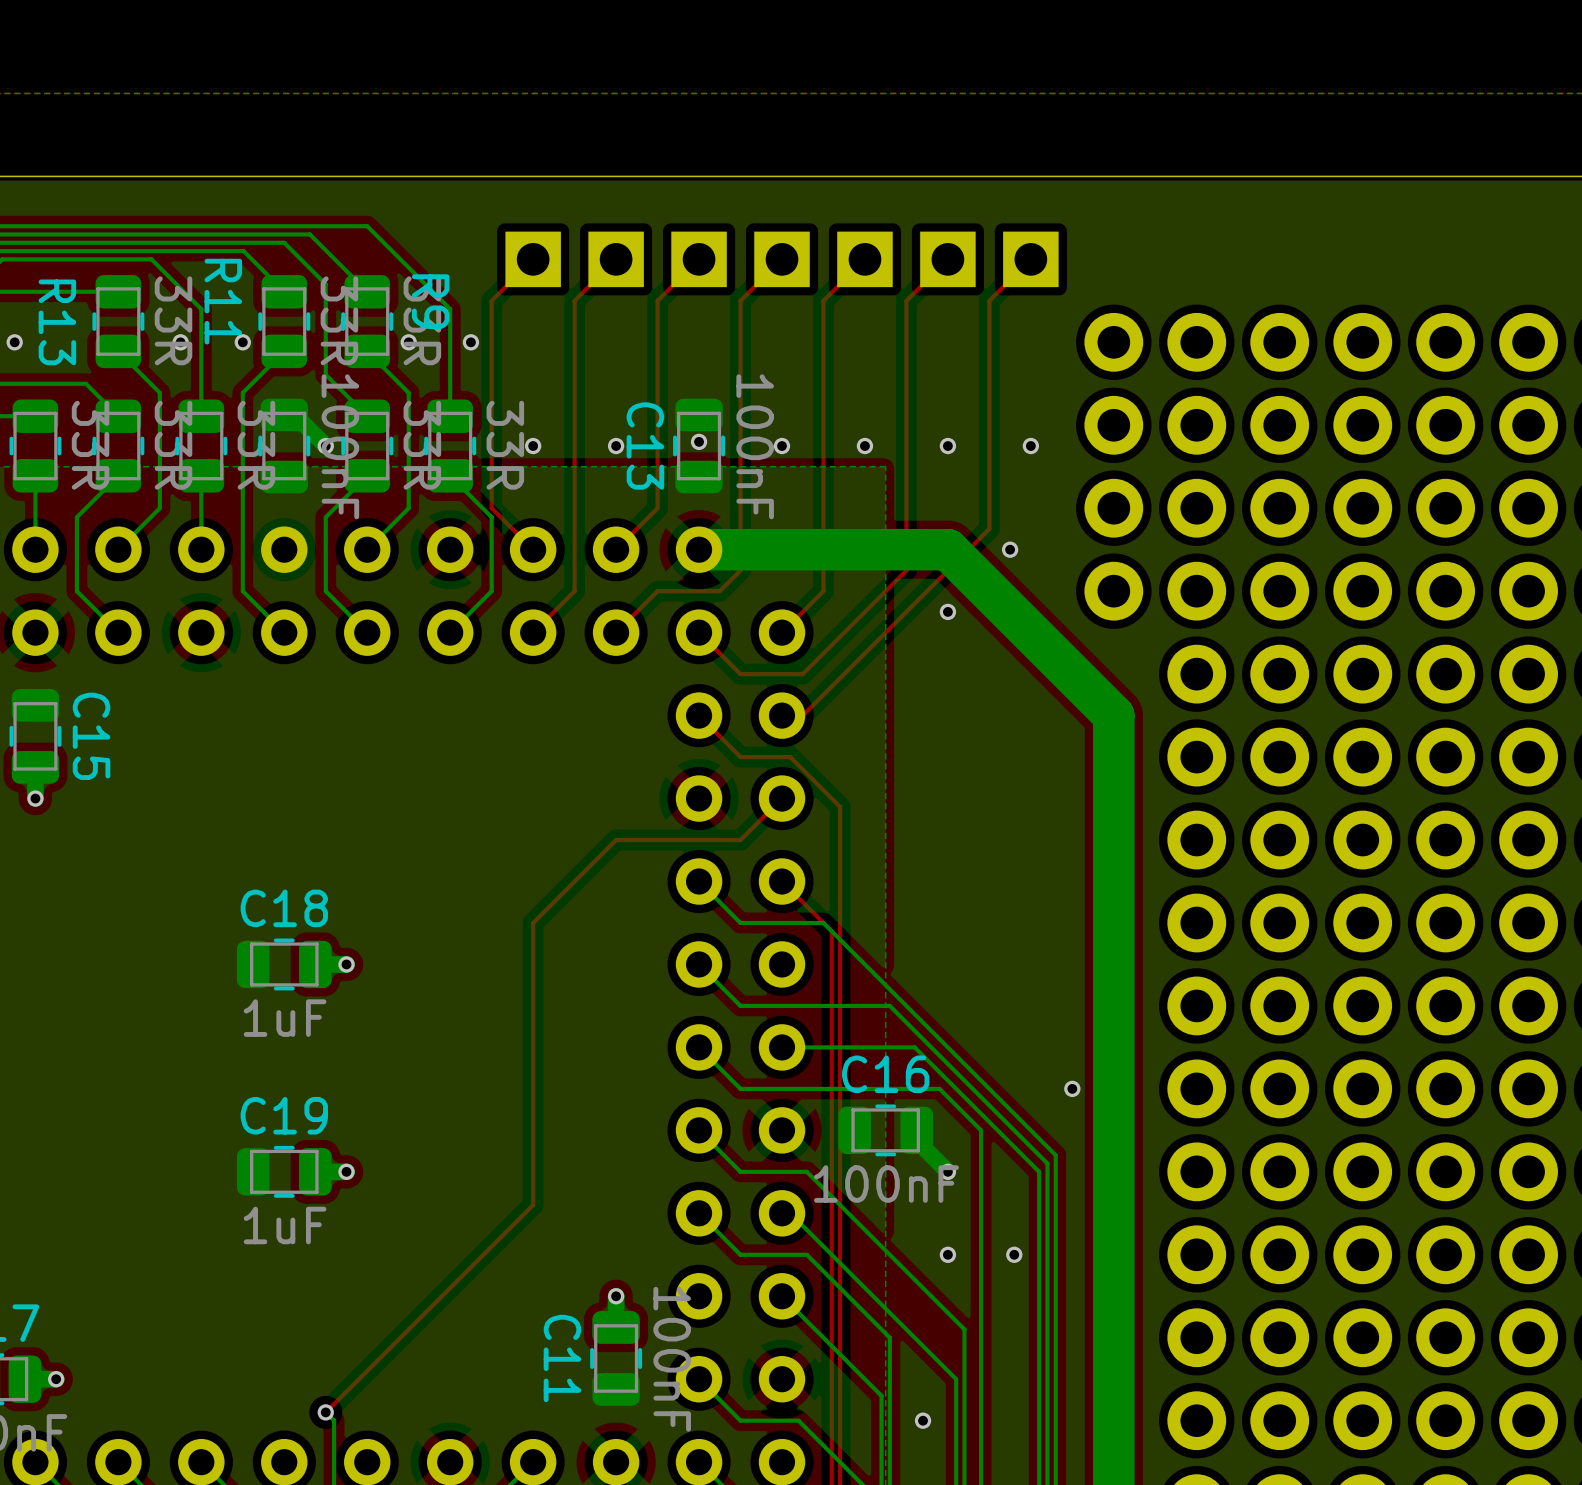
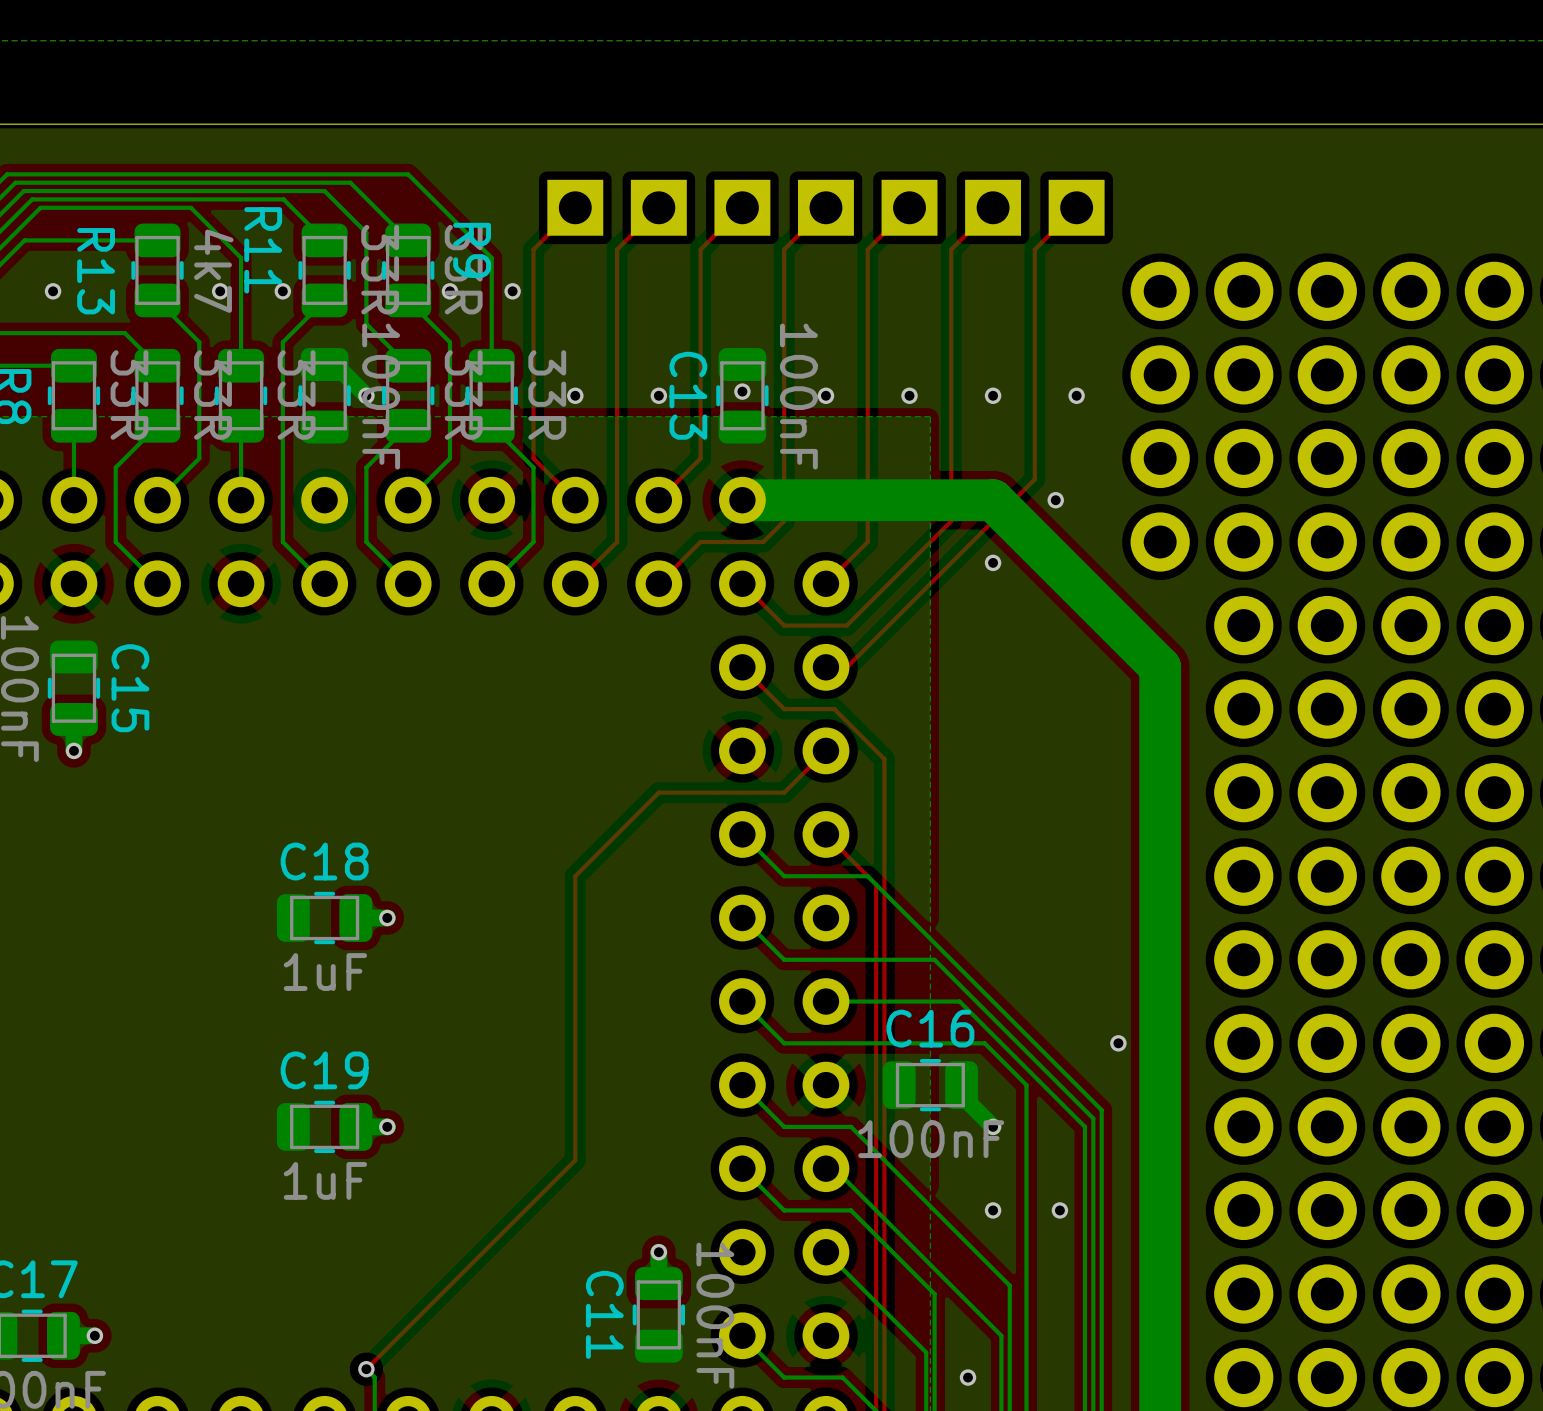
R13 value: 33R (173, 320) -> 4k7 (213, 271)

